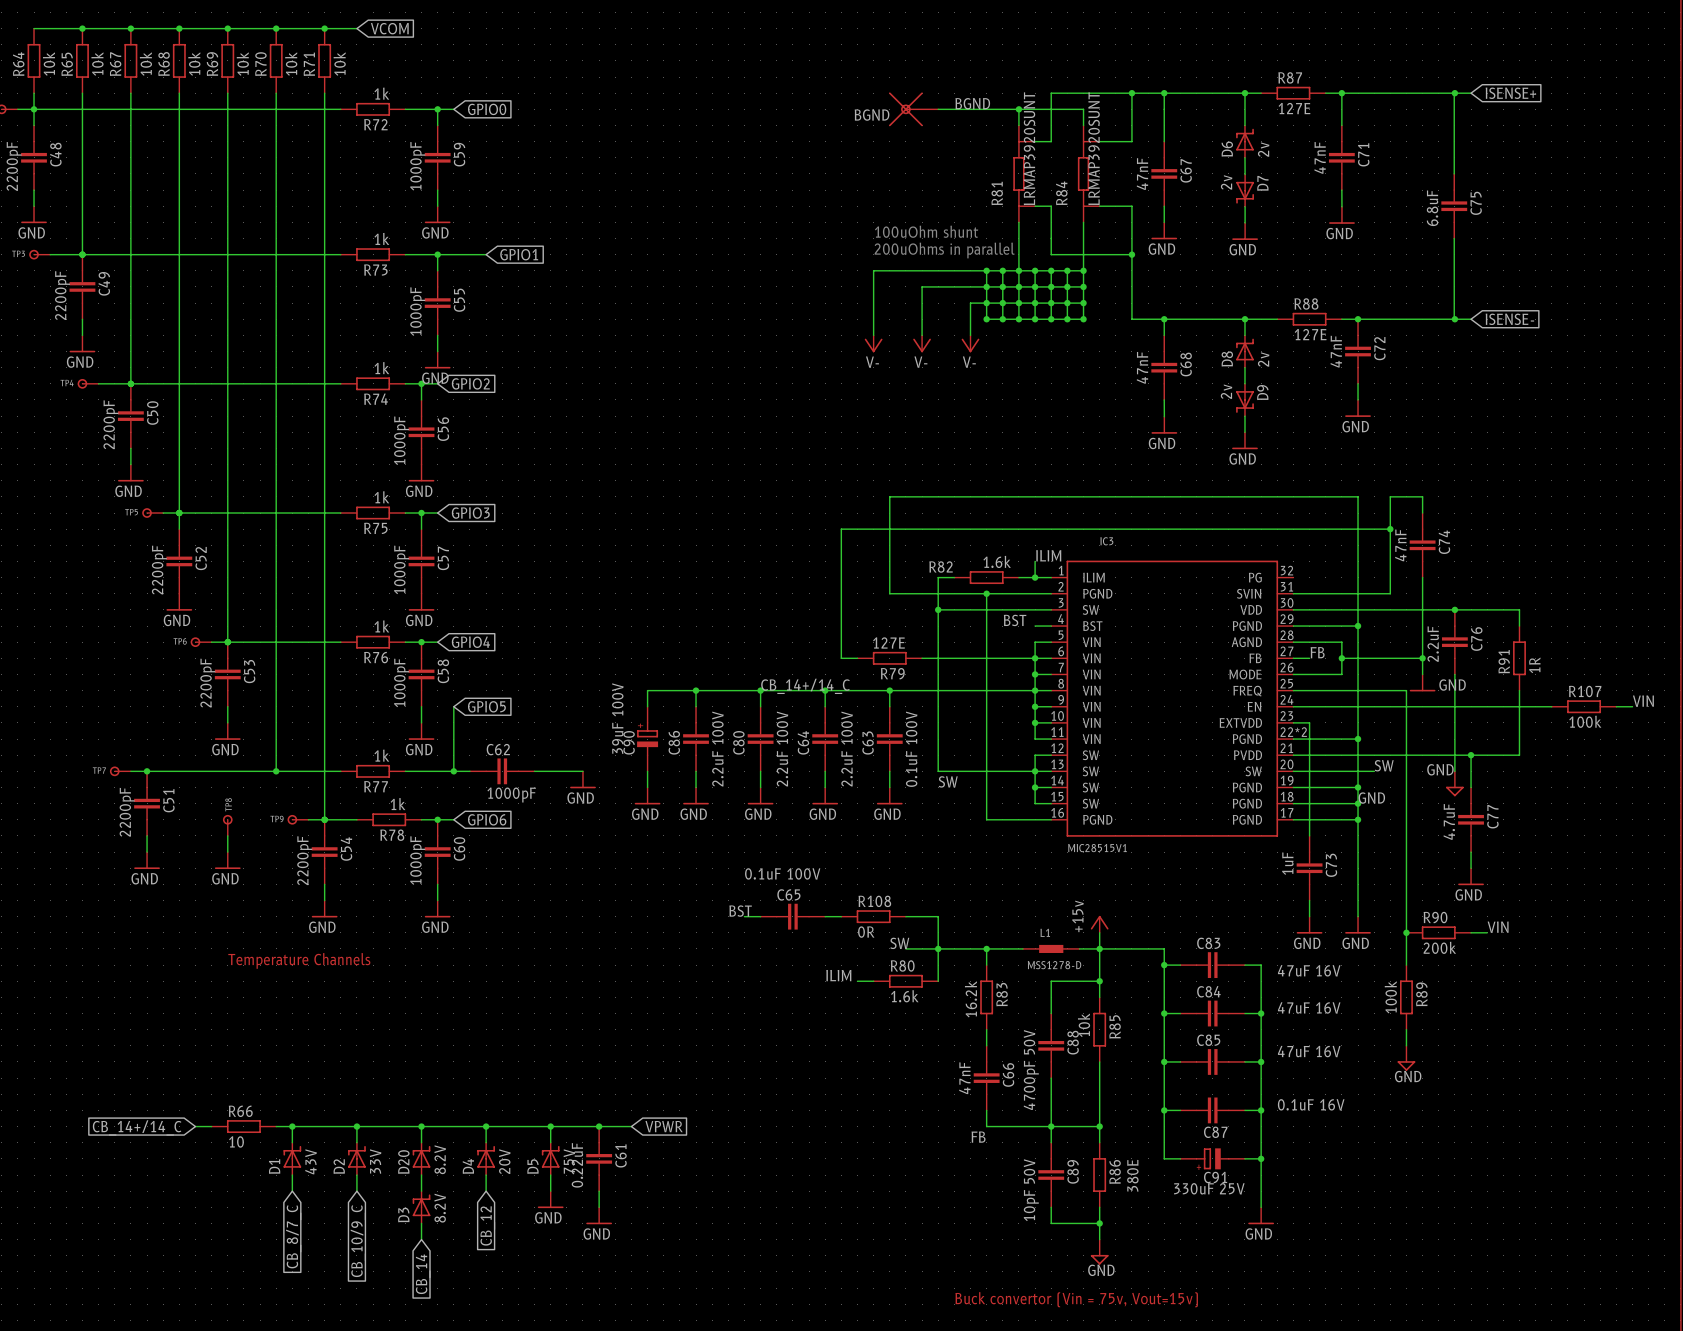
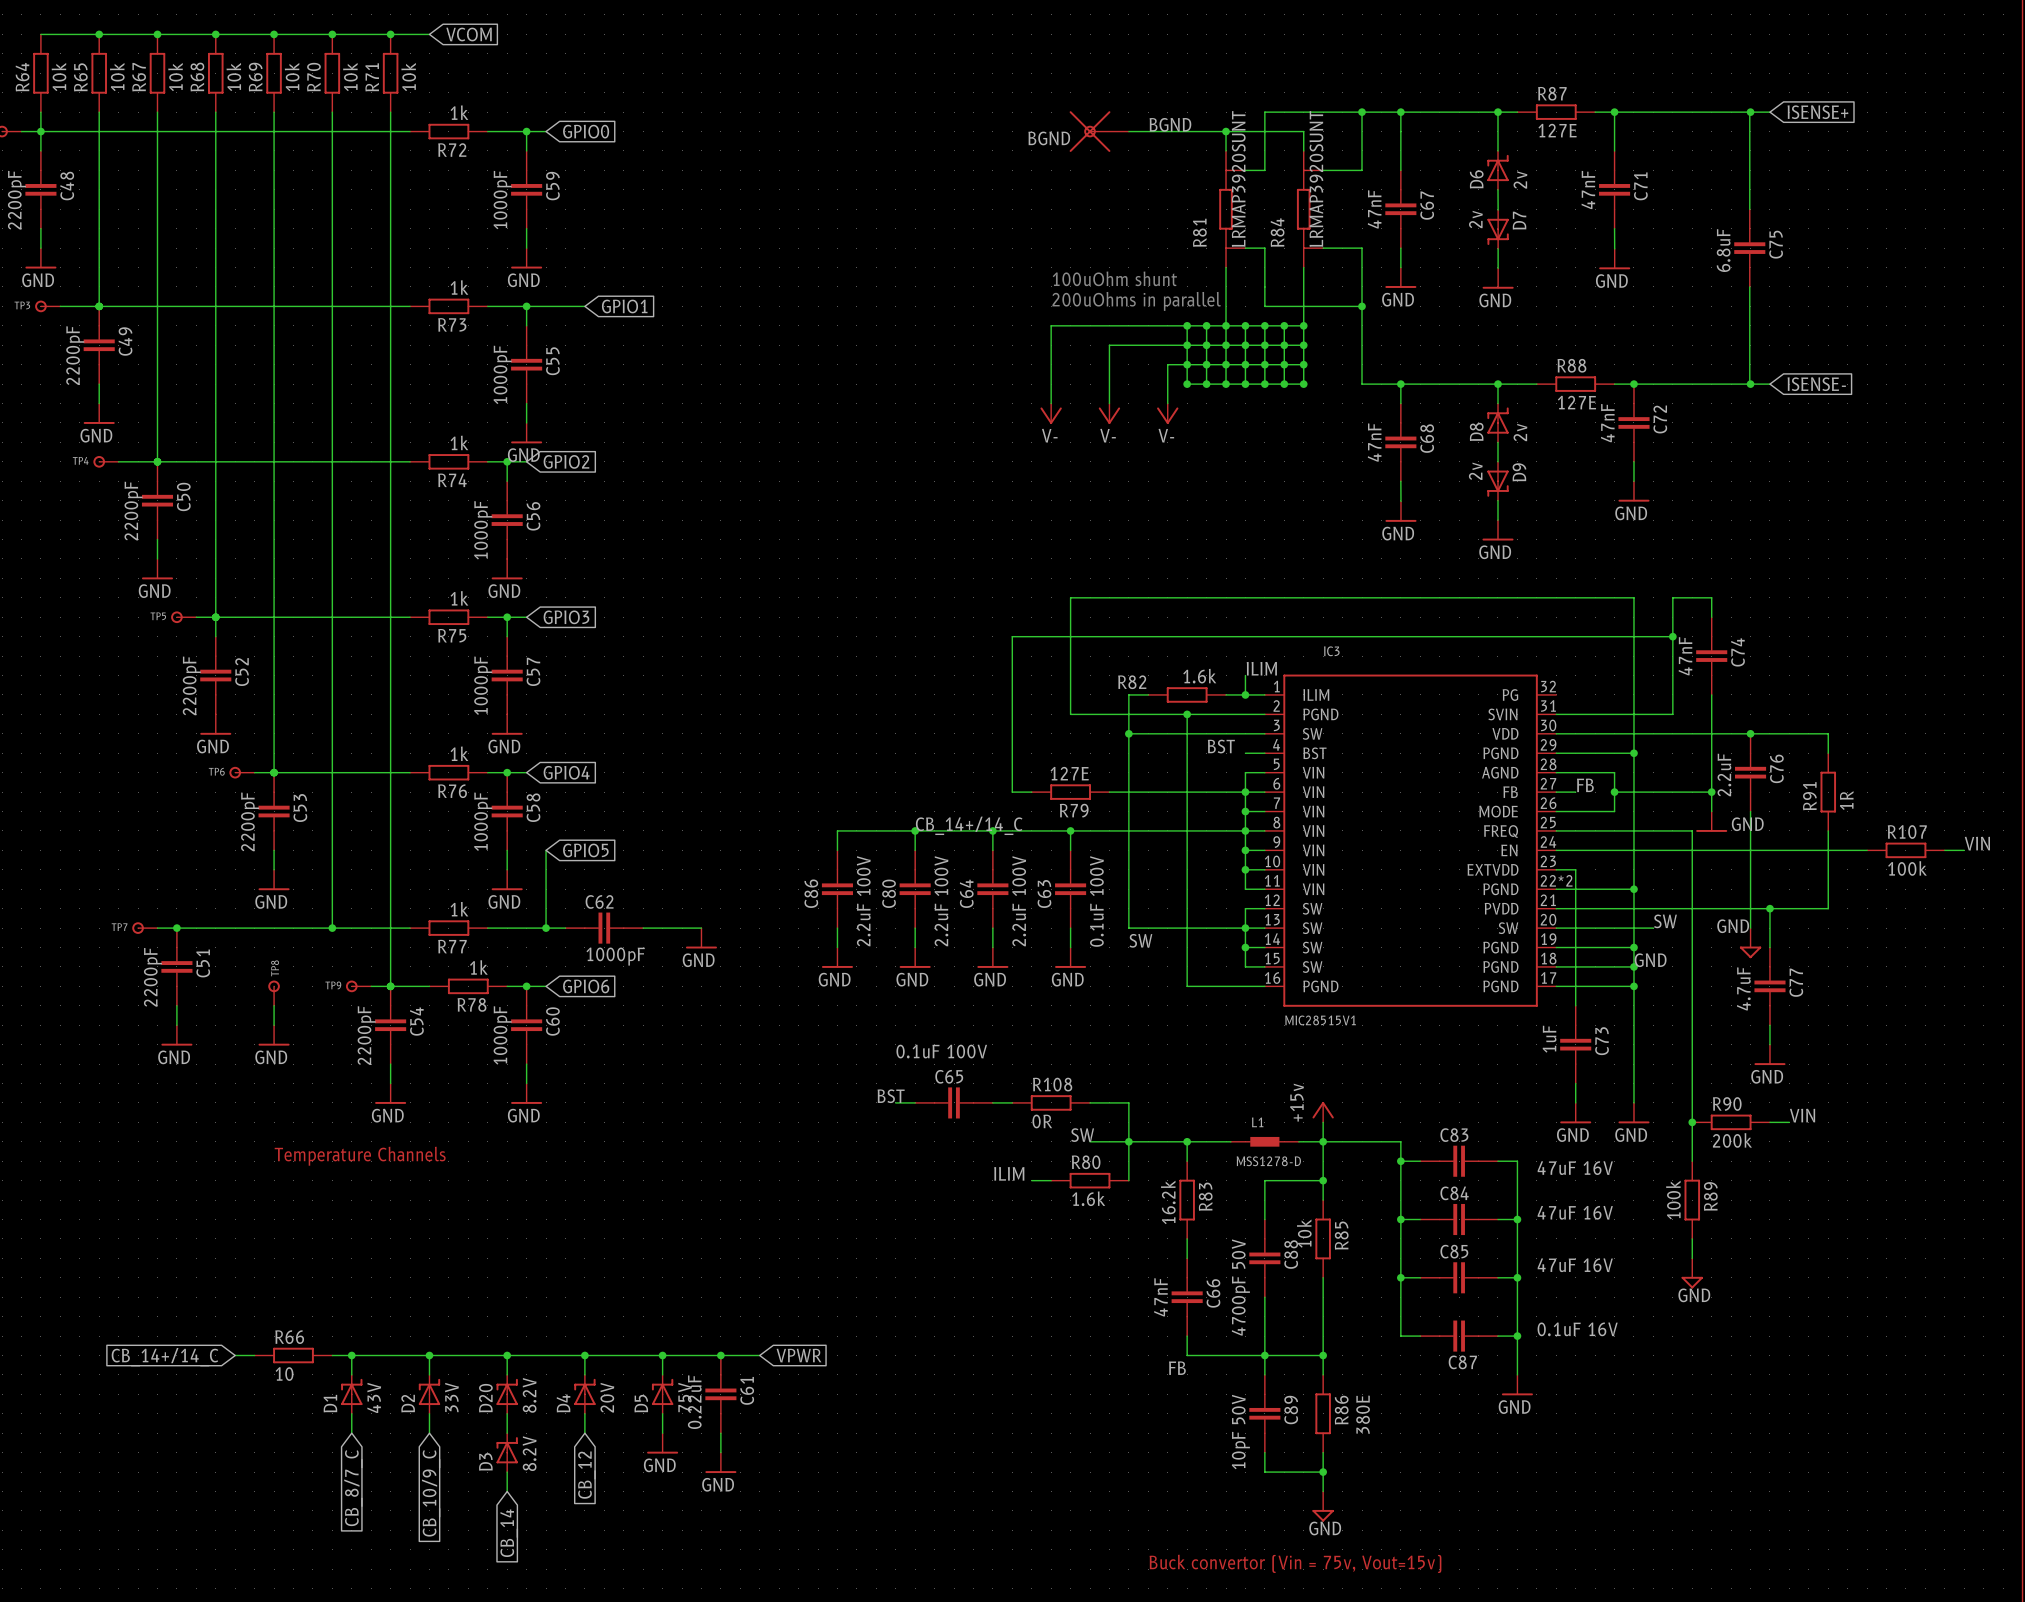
wire: (696, 690) (647, 690) (647, 706) -> none
junction: (696, 690) -> none
C90: 39uF 100V (647, 739) -> none
wire: (647, 771) (647, 787) -> none
power symbol: GND (647, 795) -> none
wire: (1164, 1110) (1164, 1158) (1180, 1158) -> none
junction: (1164, 1110) -> none
wire: (1261, 1142) (1261, 1207) -> none
C91: 330uF 25V (1212, 1158) -> none
junction: (1261, 1158) -> none
power symbol position: GND (1261, 1215) -> GND (1517, 1385)

